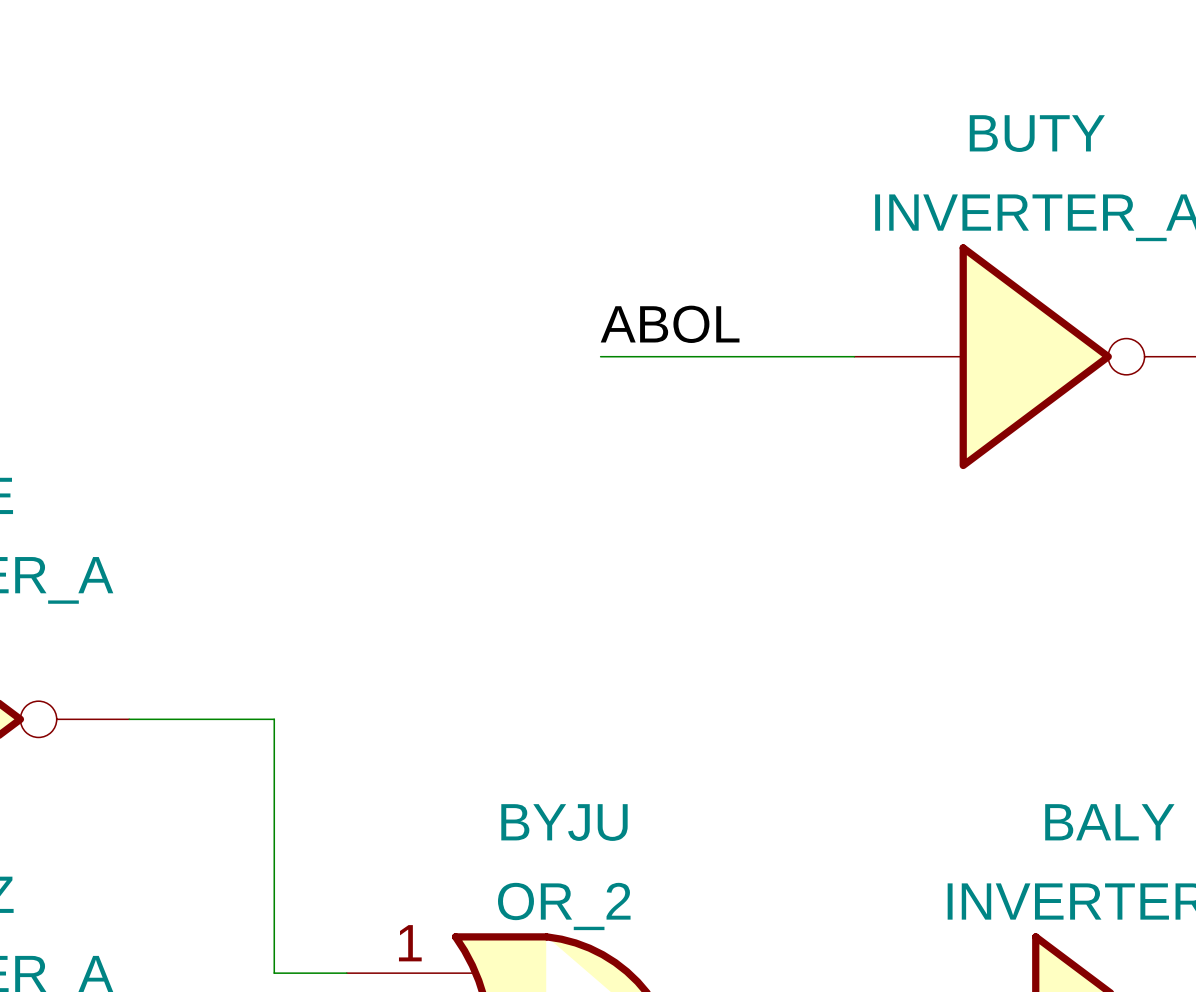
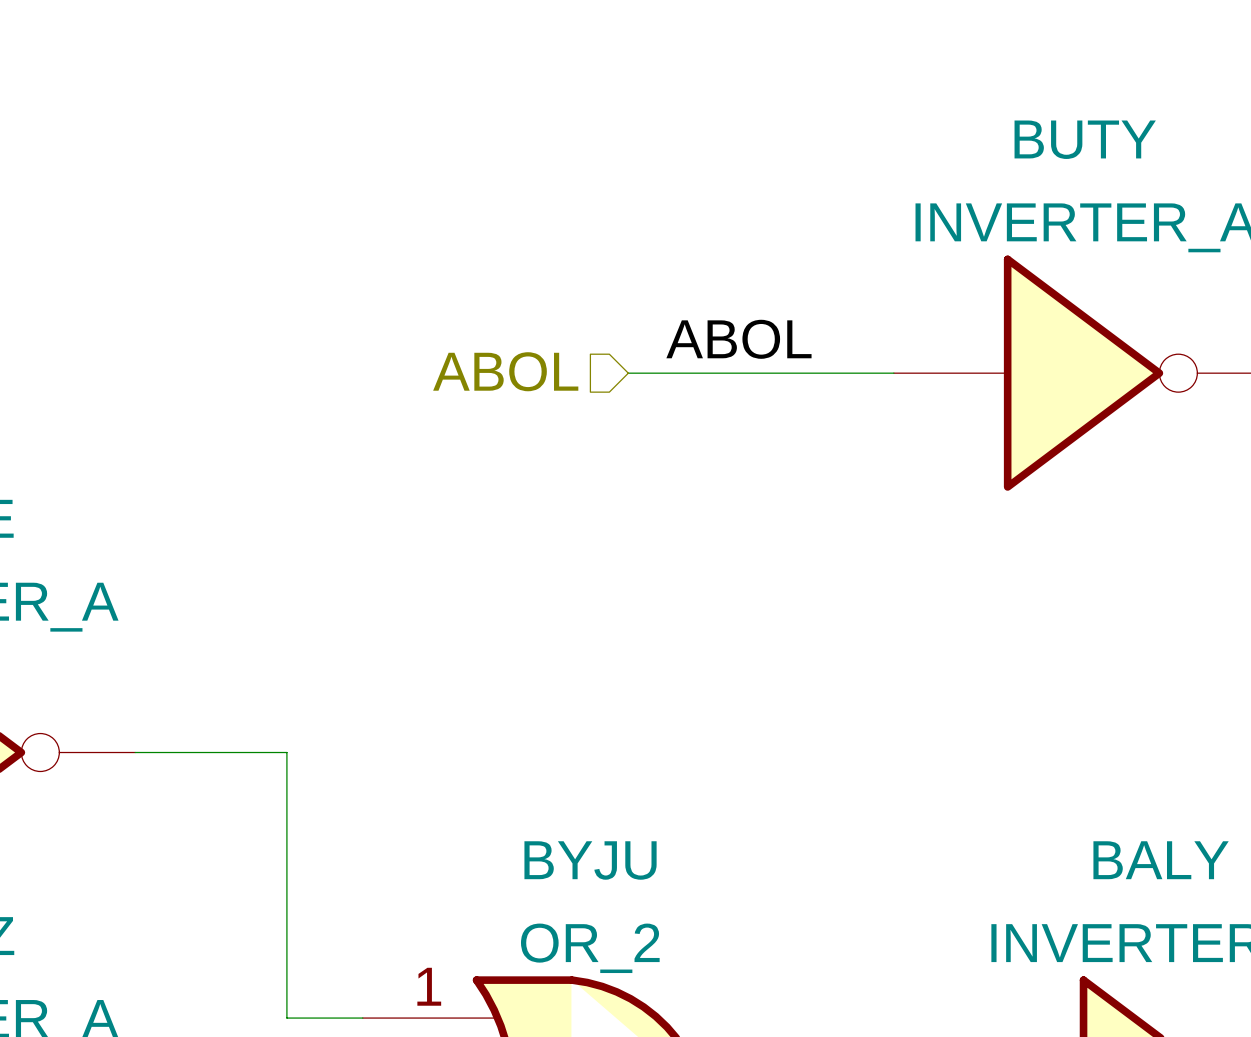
label position: ABOL (670, 324) -> ABOL (738, 339)
hierarchical label: none -> ABOL (505, 371)

